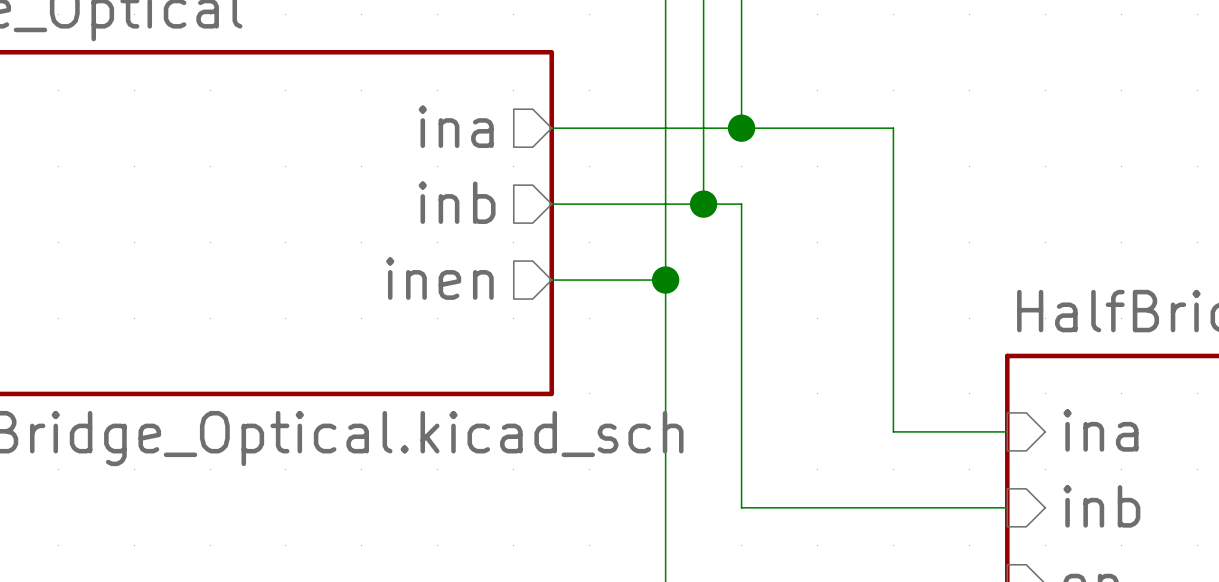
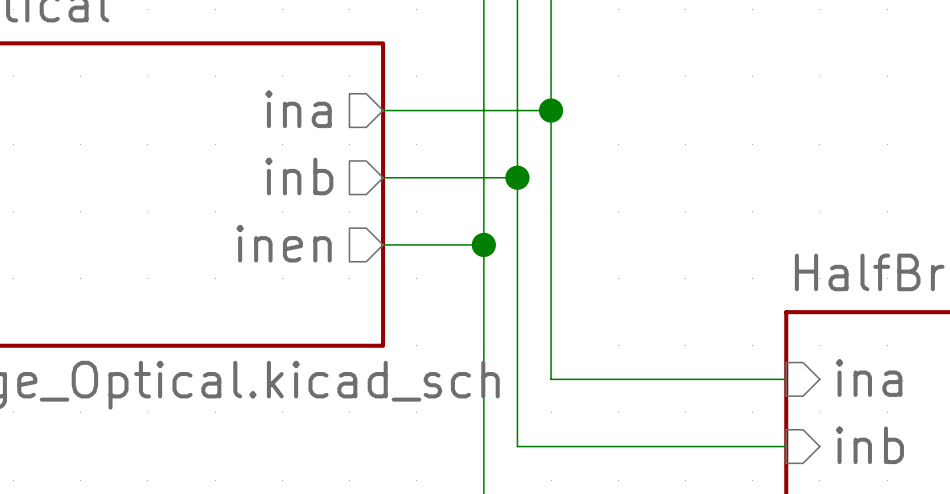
wire: (741, 128) (893, 128) (893, 431) -> none
wire: (703, 204) (741, 204) -> (551, 110) (551, 177)
wire: none -> (517, 177) (517, 446) (551, 446)
wire: (741, 431) (741, 507) -> (551, 379) (685, 379)

